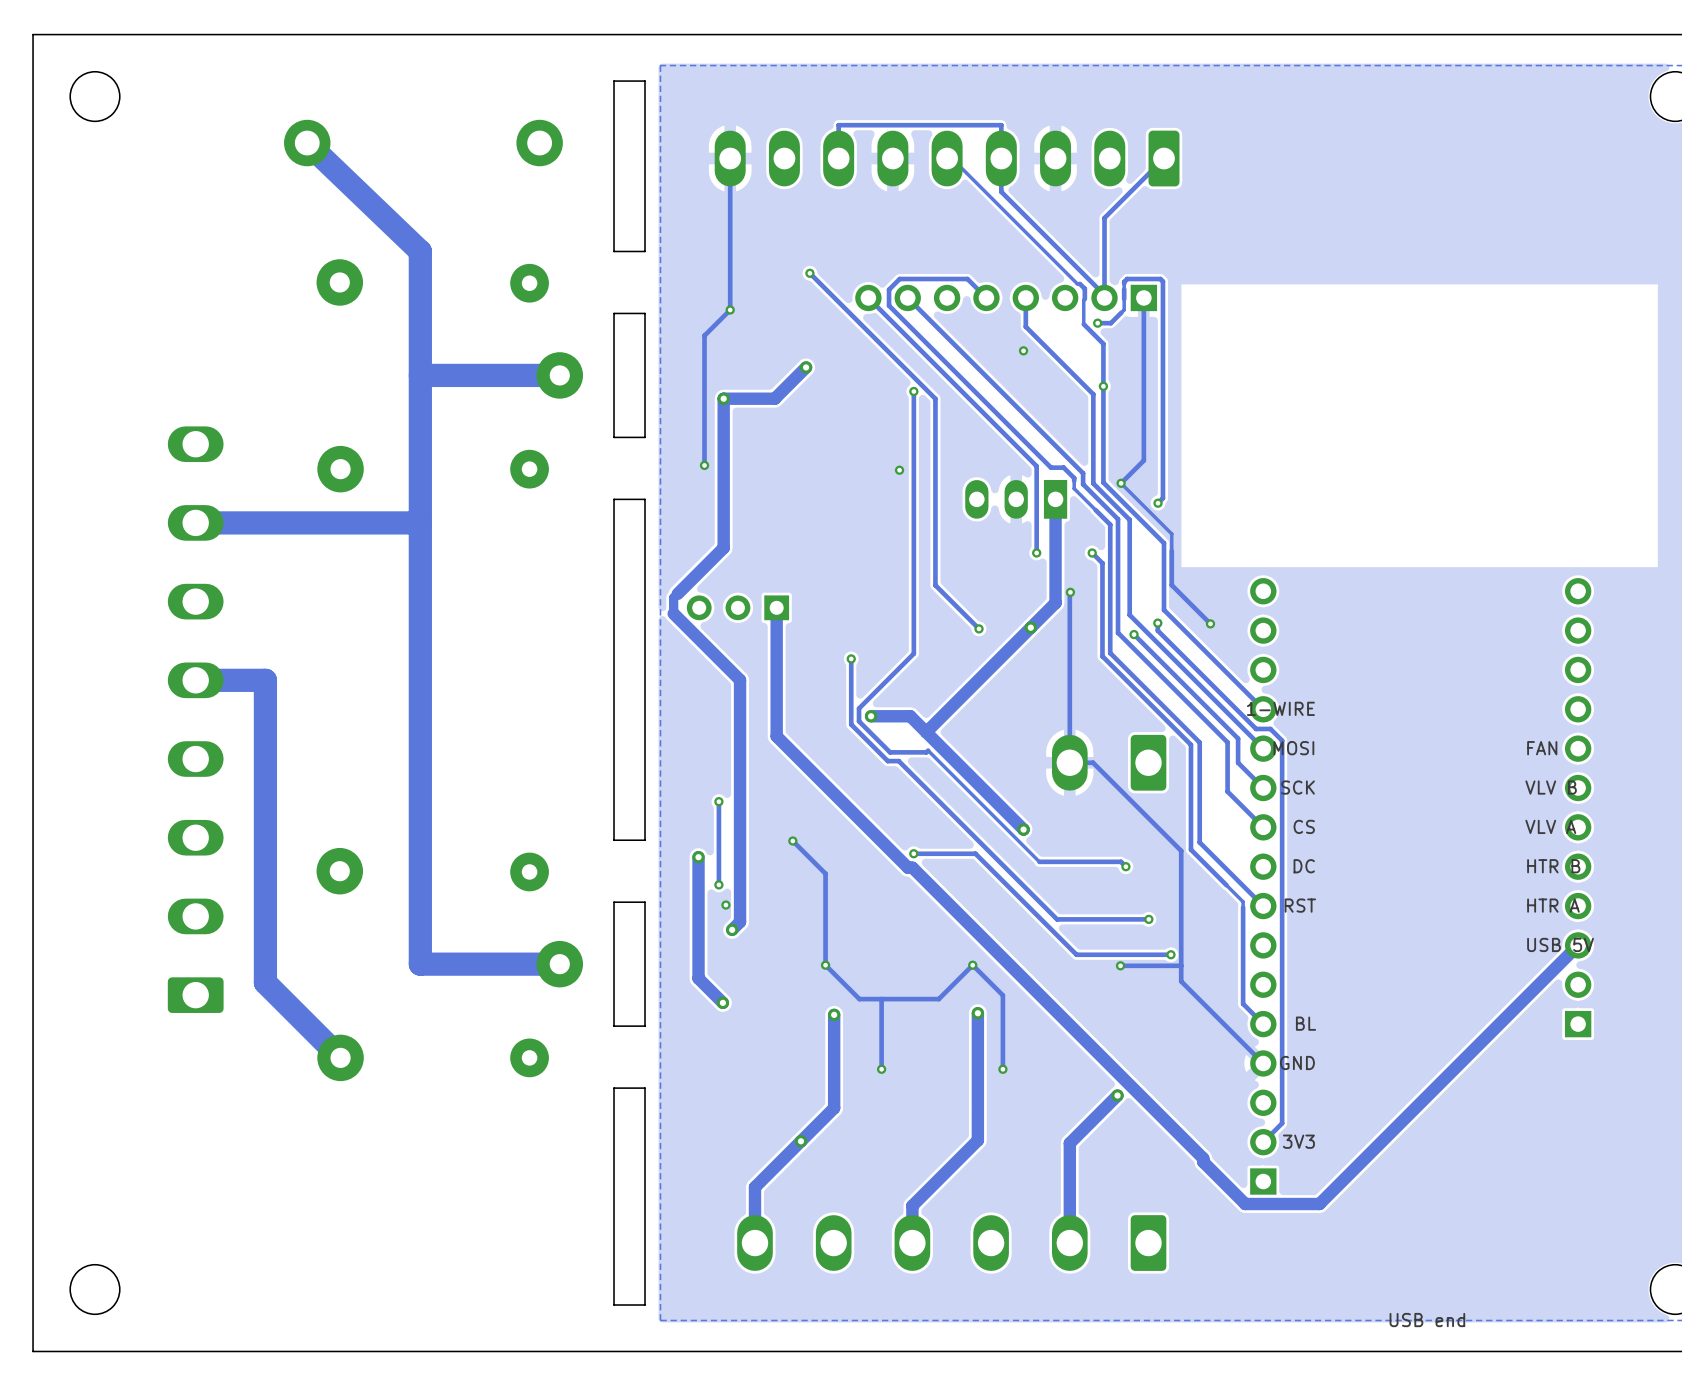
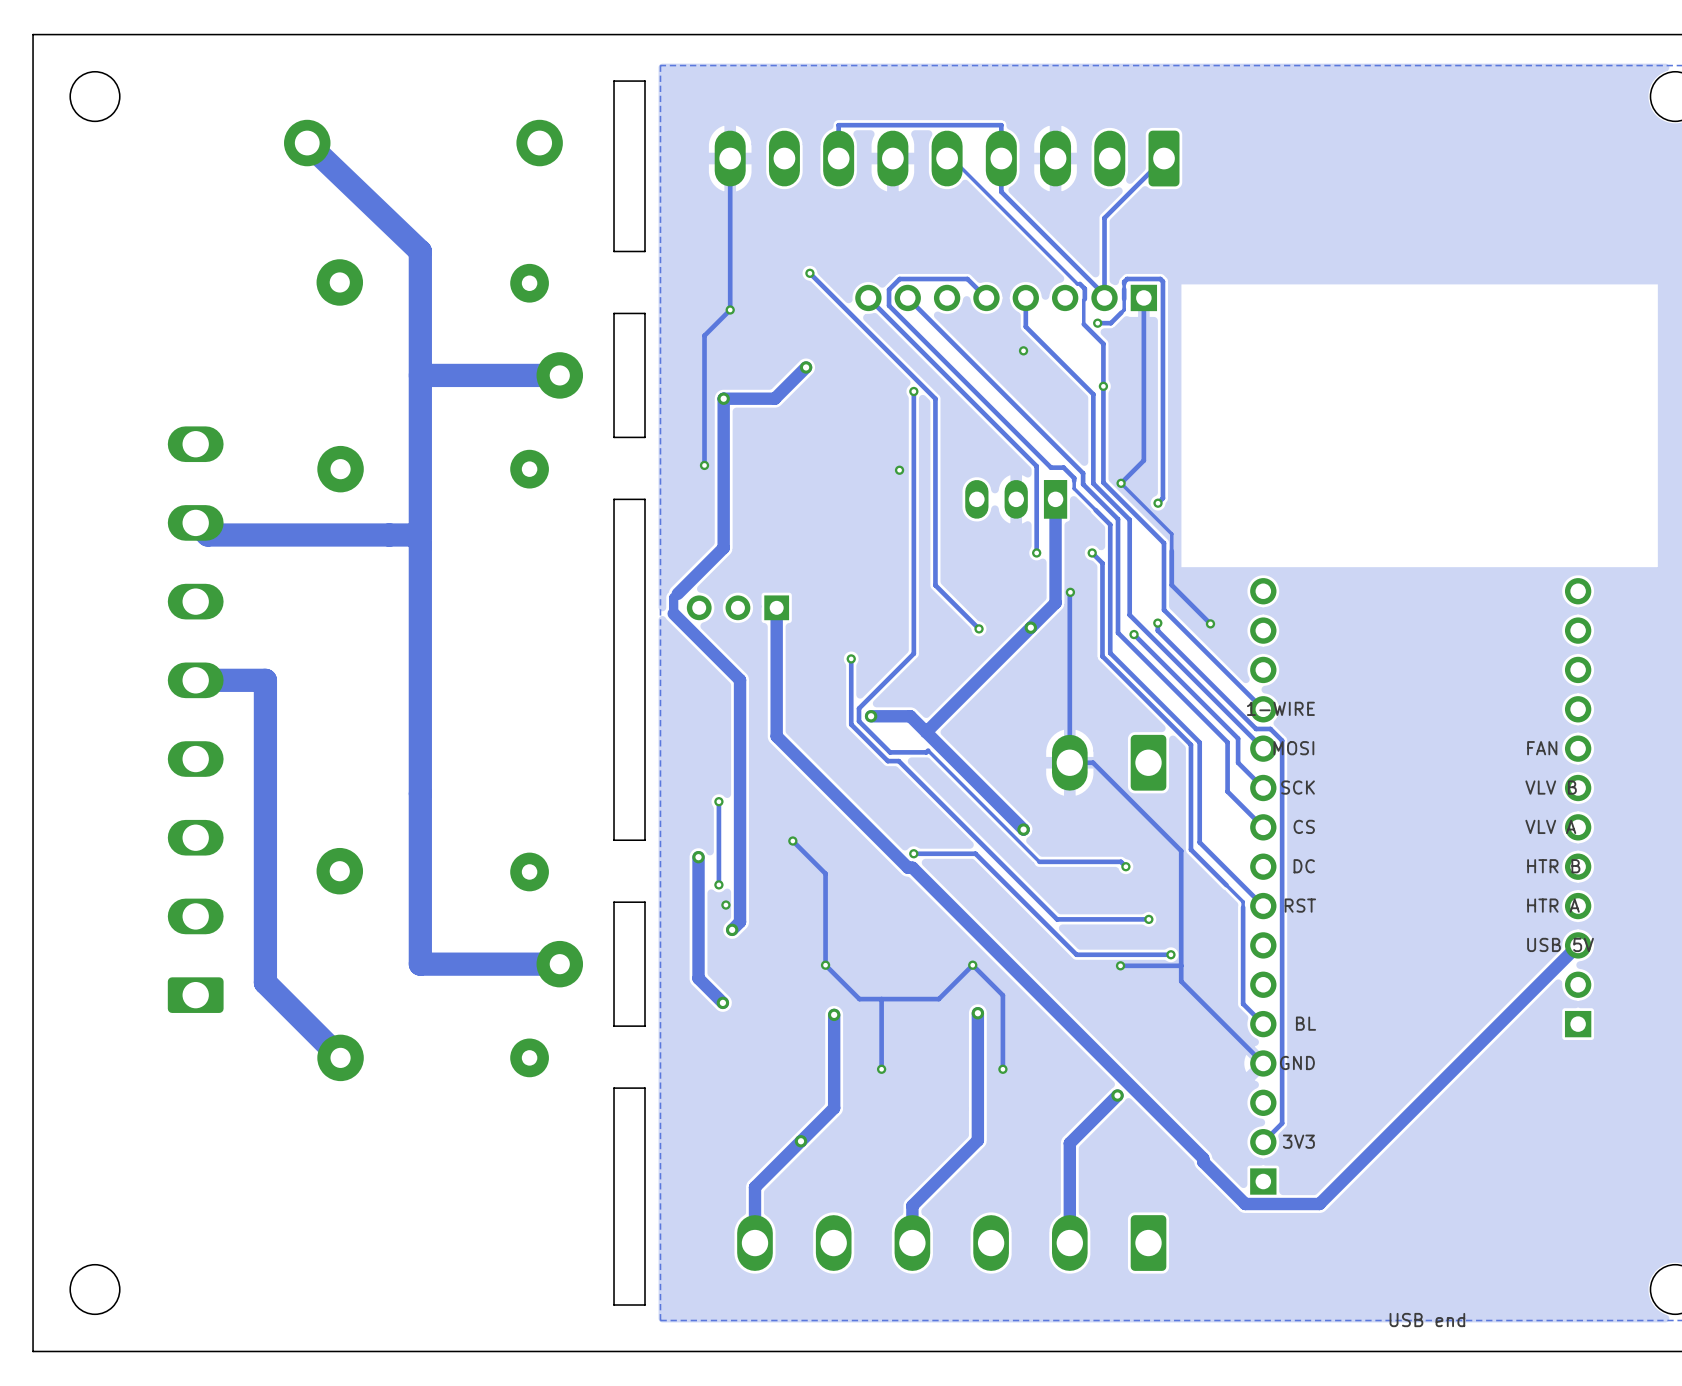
track: (420, 522) (195, 522) -> (420, 535) (207, 535) (195, 522)

